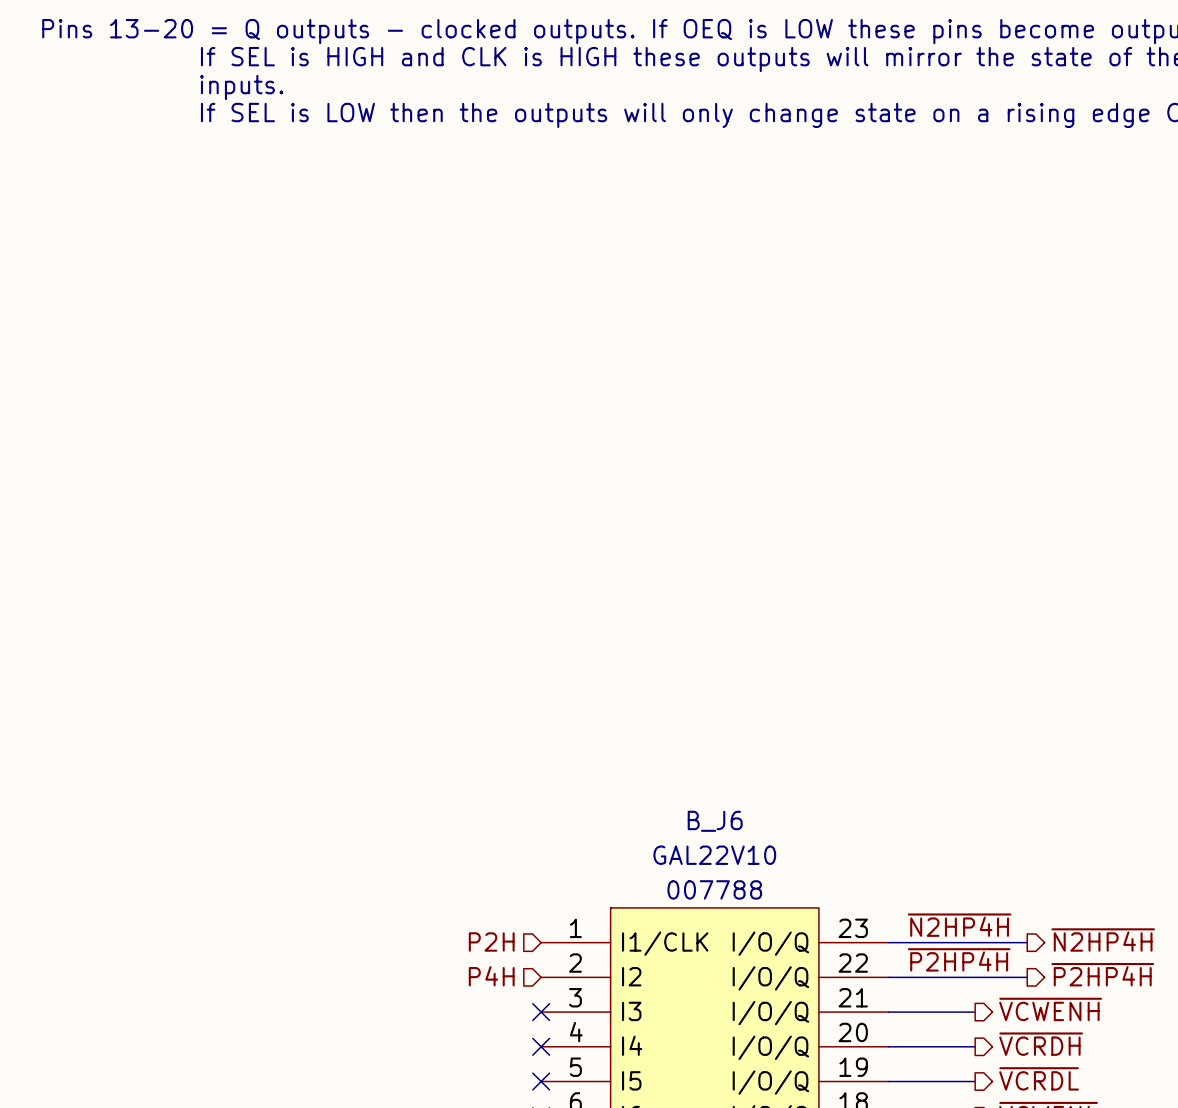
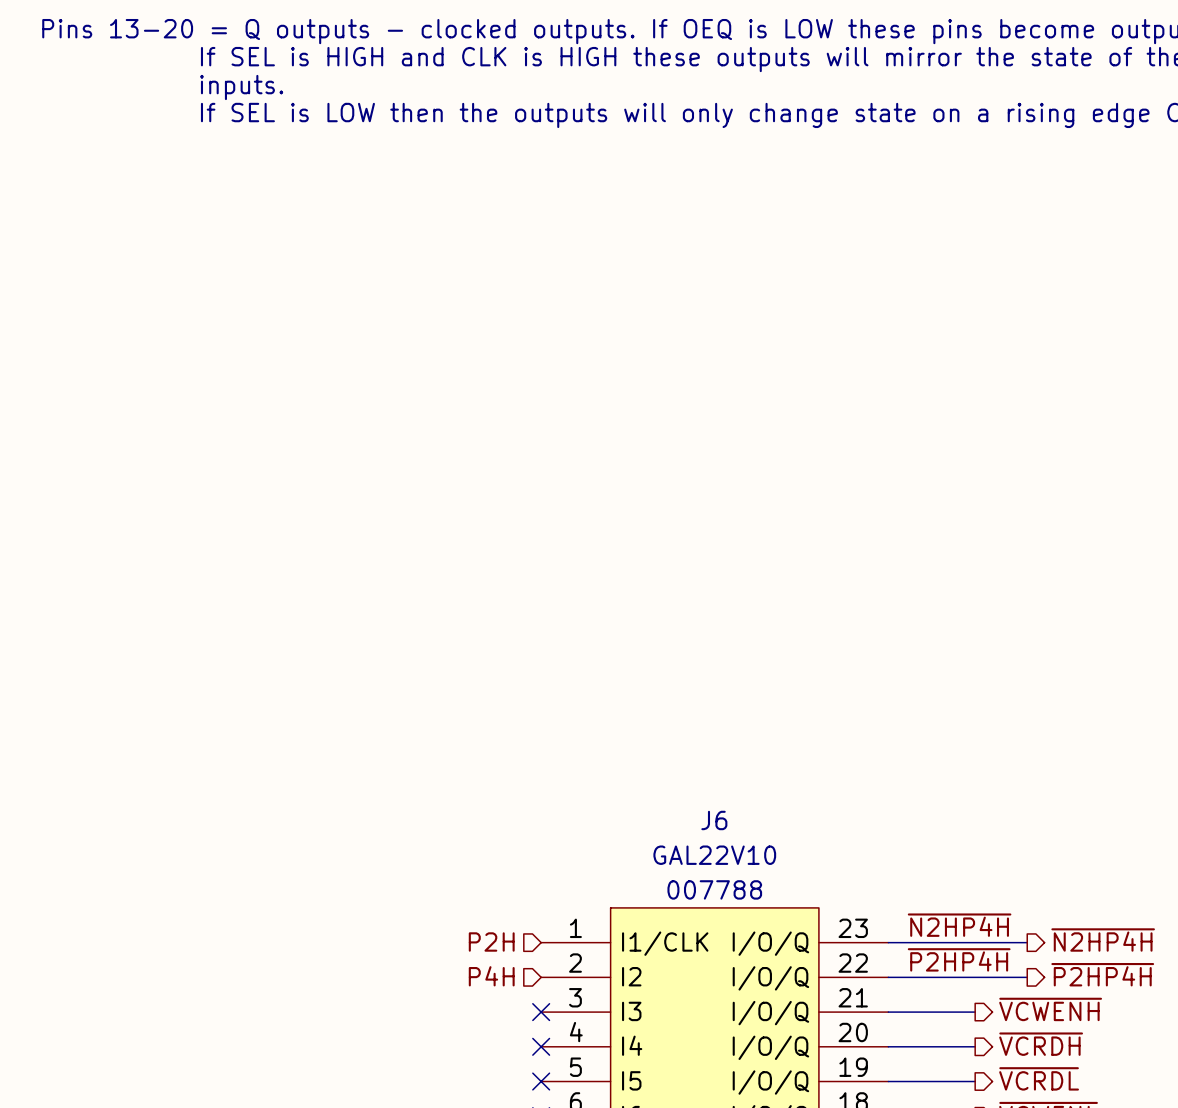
B_J6 name: B_J6 (715, 821) -> J6 (714, 820)

